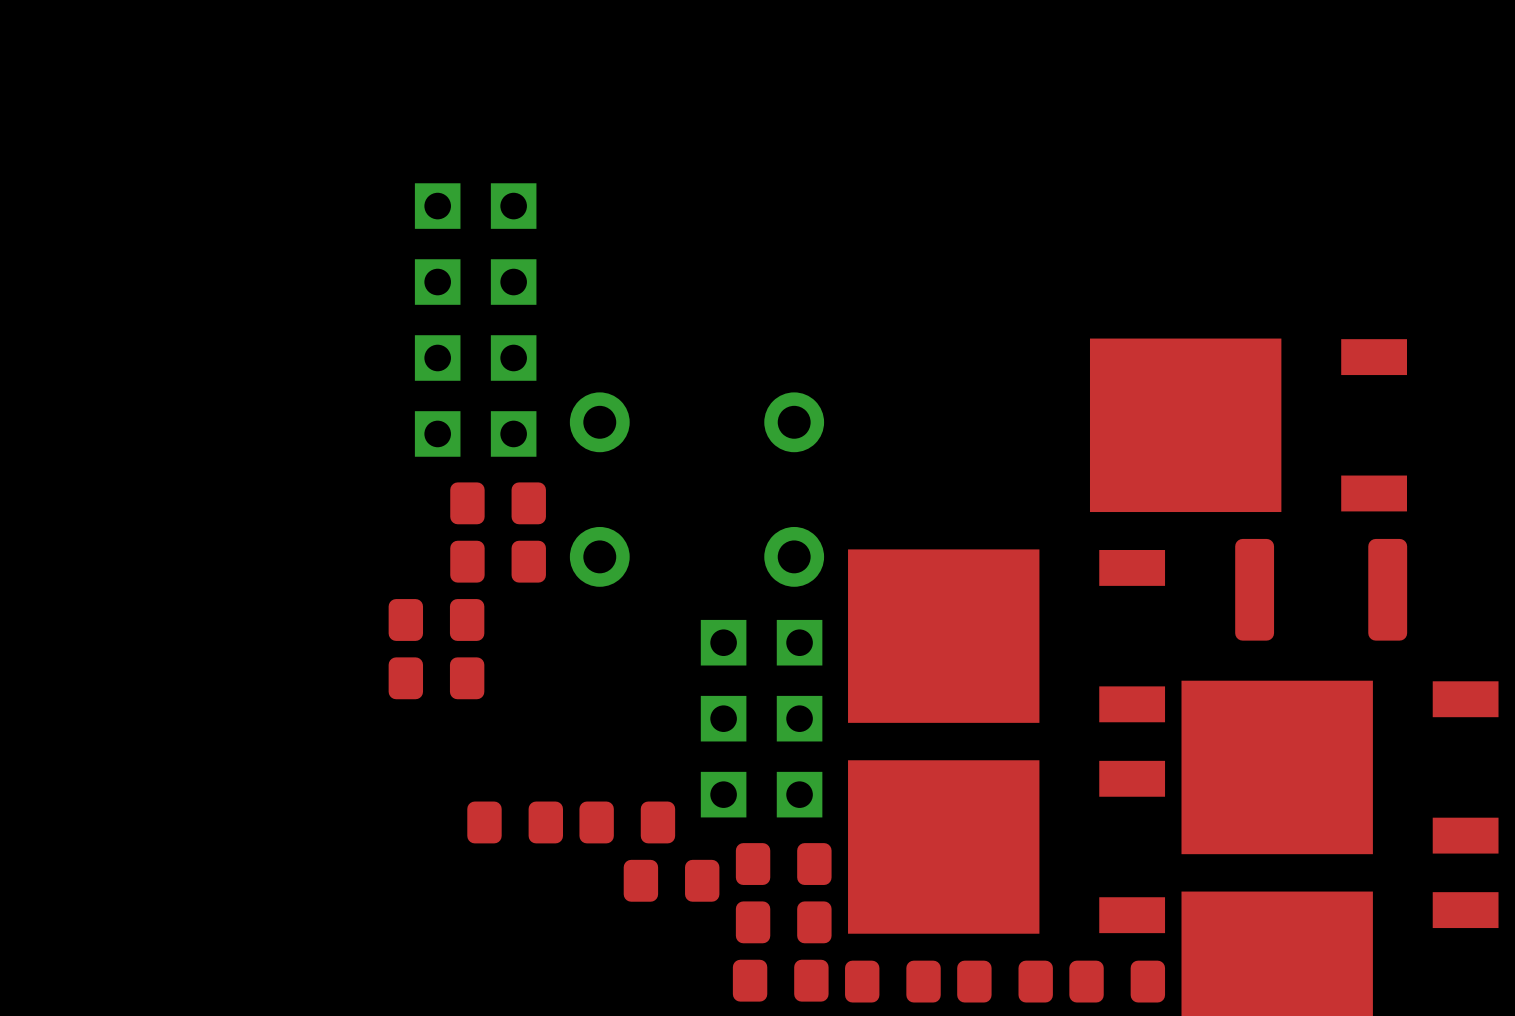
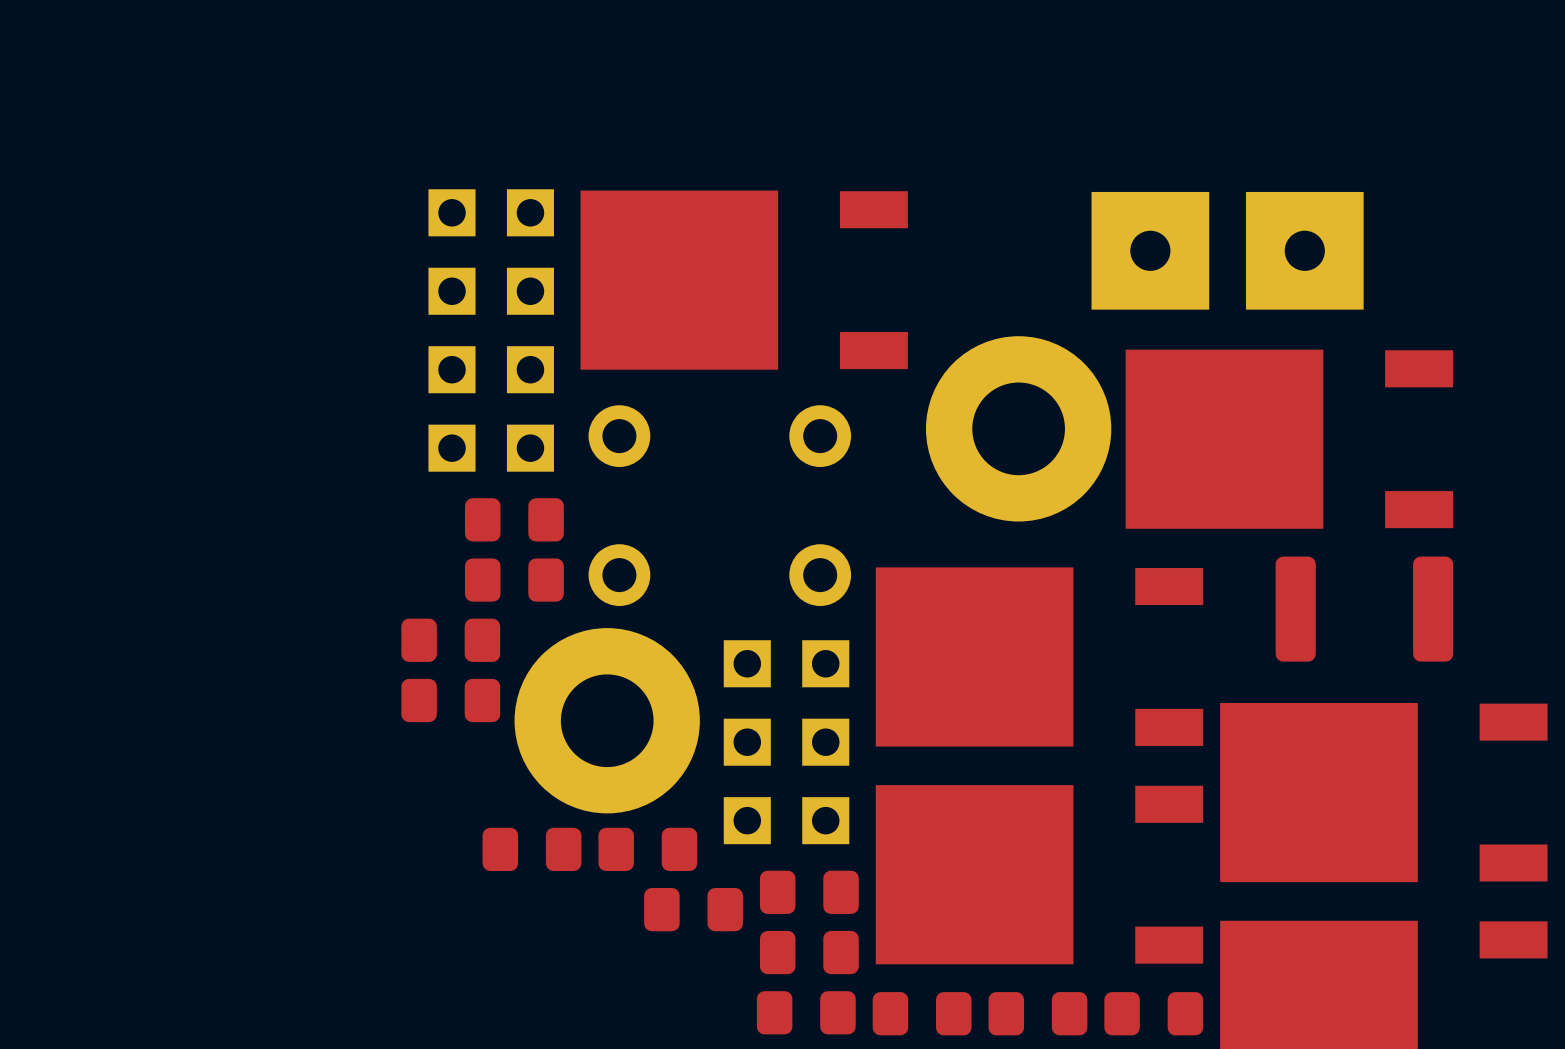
part: none -> (1227, 250)
part: none -> (744, 280)
part: none -> (1018, 428)
part: none -> (607, 720)

